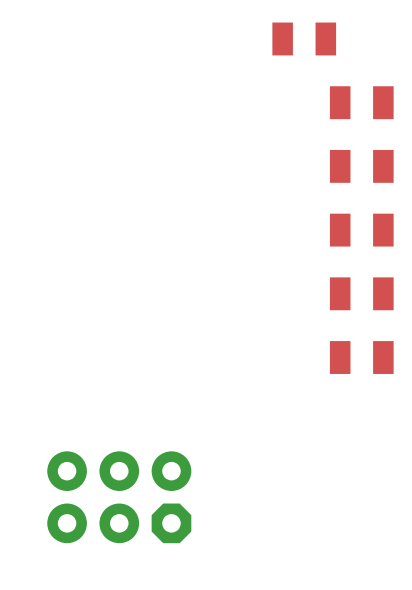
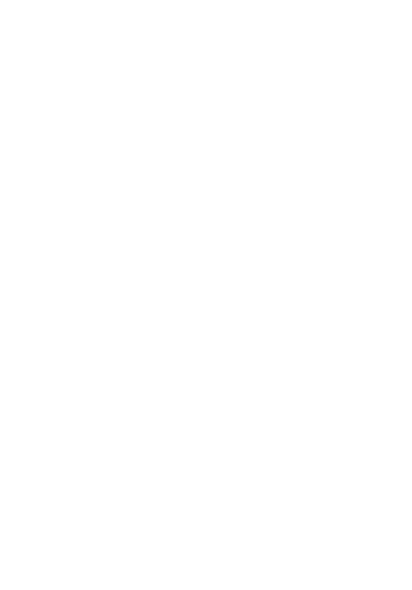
part: (304, 38) -> none
part: (361, 102) -> none
part: (361, 166) -> none
part: (361, 230) -> none
part: (361, 293) -> none
part: (361, 357) -> none
part: (119, 497) -> none

